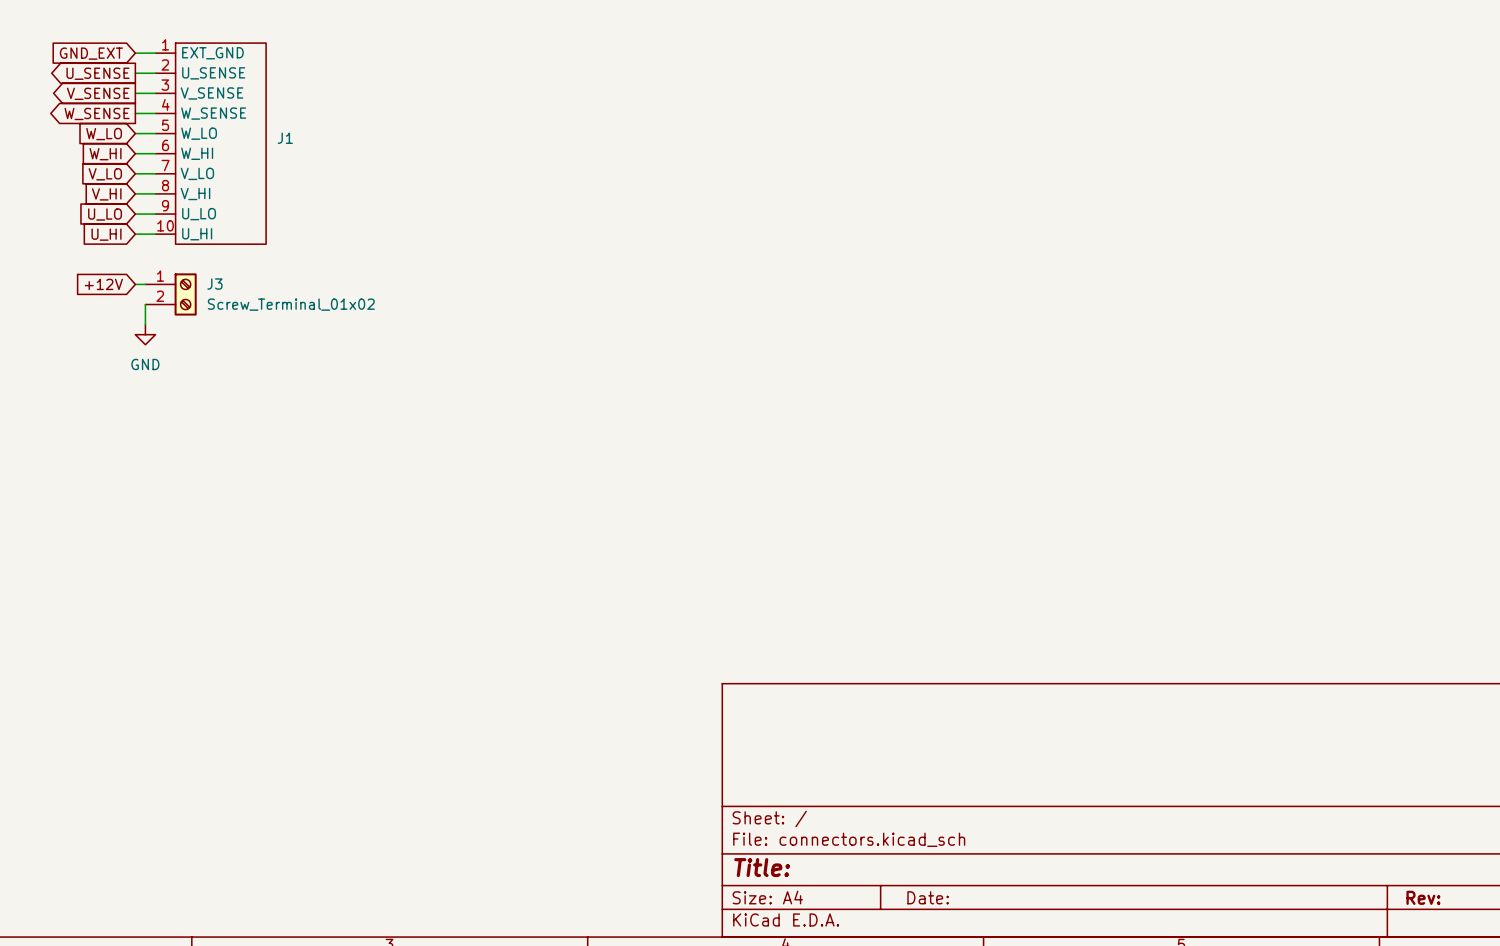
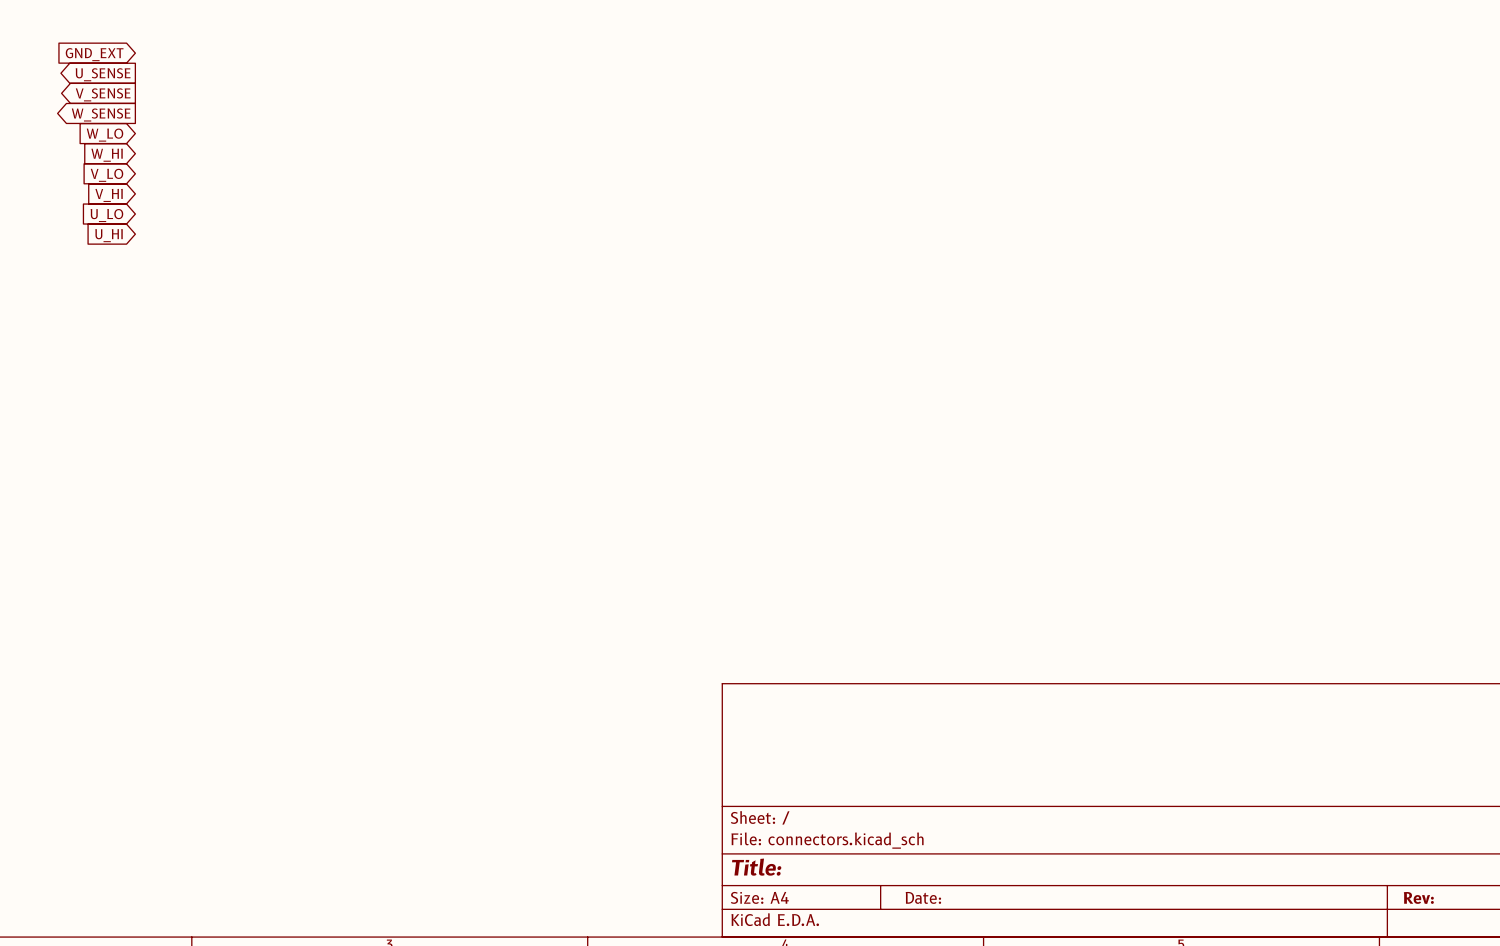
wire: (135, 53) (155, 53) -> none
wire: (135, 73) (155, 73) -> none
wire: (135, 93) (155, 93) -> none
wire: (135, 113) (155, 113) -> none
wire: (135, 133) (155, 133) -> none
J1: (210, 143) -> none
wire: (135, 153) (155, 153) -> none
wire: (135, 173) (155, 173) -> none
wire: (135, 193) (155, 193) -> none
wire: (135, 214) (155, 214) -> none
wire: (135, 234) (155, 234) -> none
global label: +12V (103, 284) -> none
wire: (135, 284) (145, 284) -> none
J3: Screw_Terminal_01x02 (171, 294) -> none
wire: (145, 304) (145, 324) -> none
power symbol: GND (145, 334) -> none

